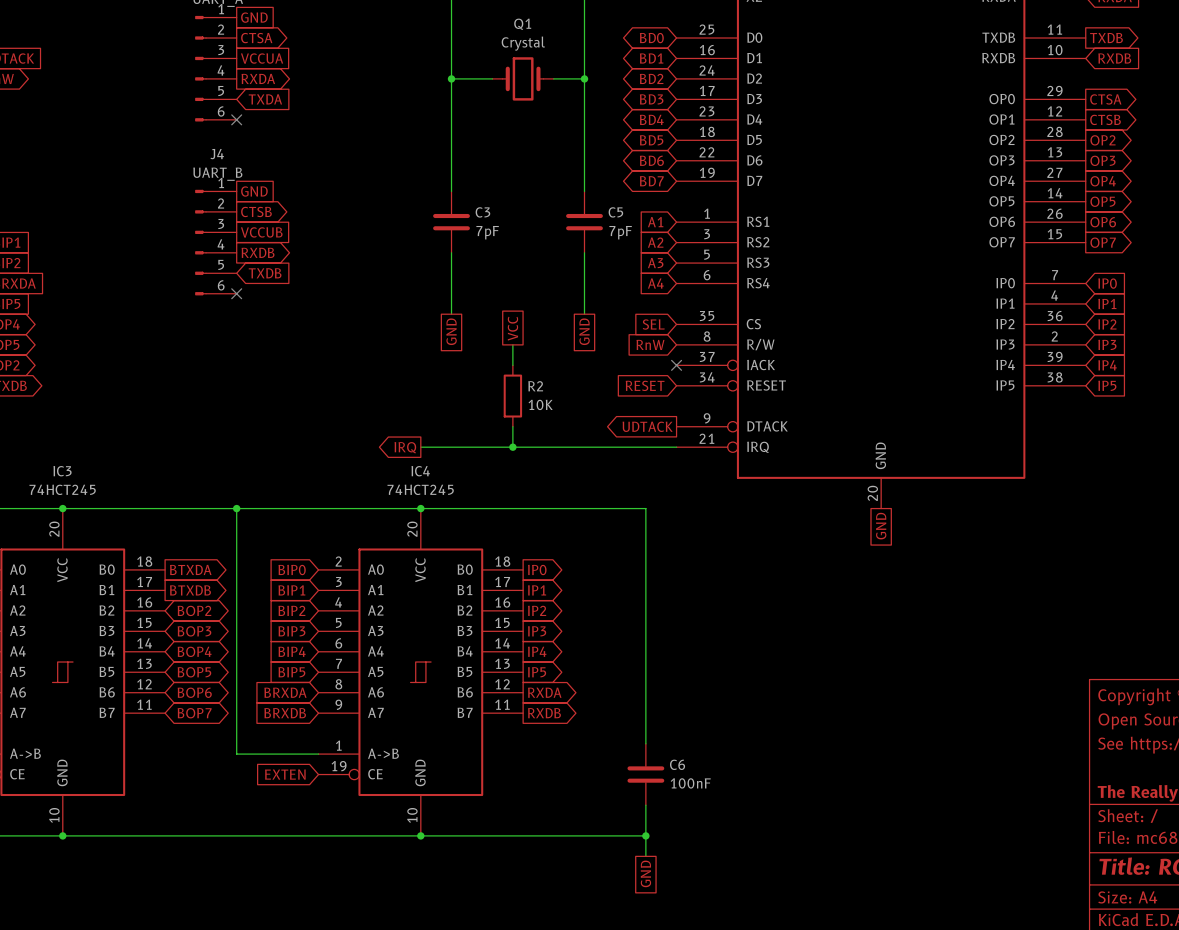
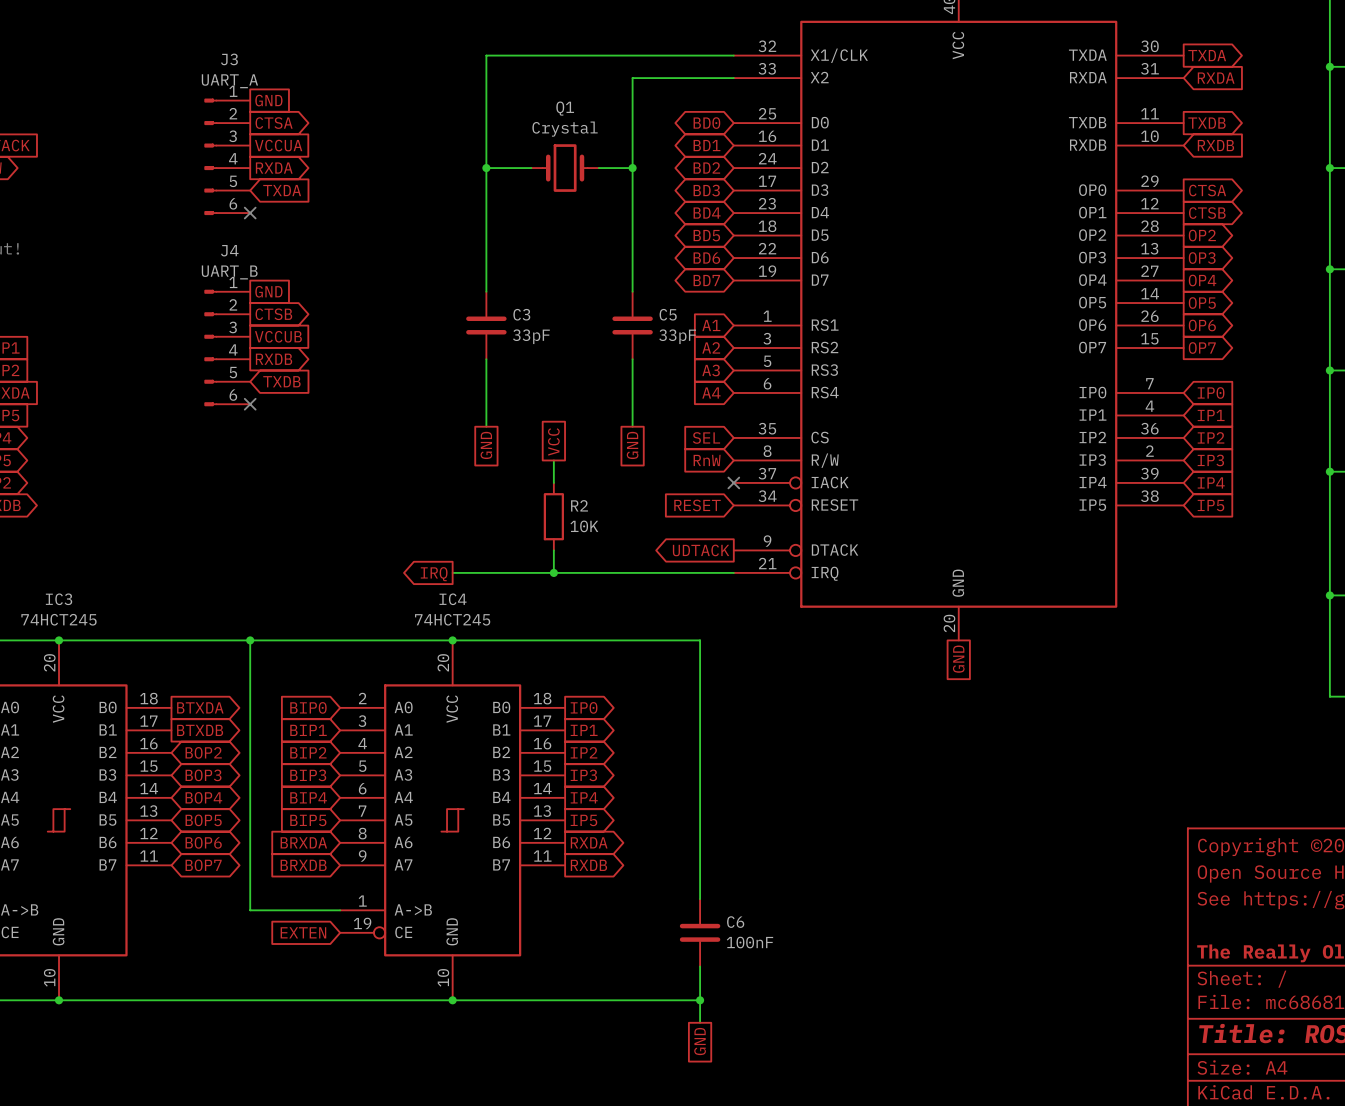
C3 value: 7pF (487, 232) -> 33pF (531, 336)
C5 value: 7pF (620, 232) -> 33pF (677, 336)

